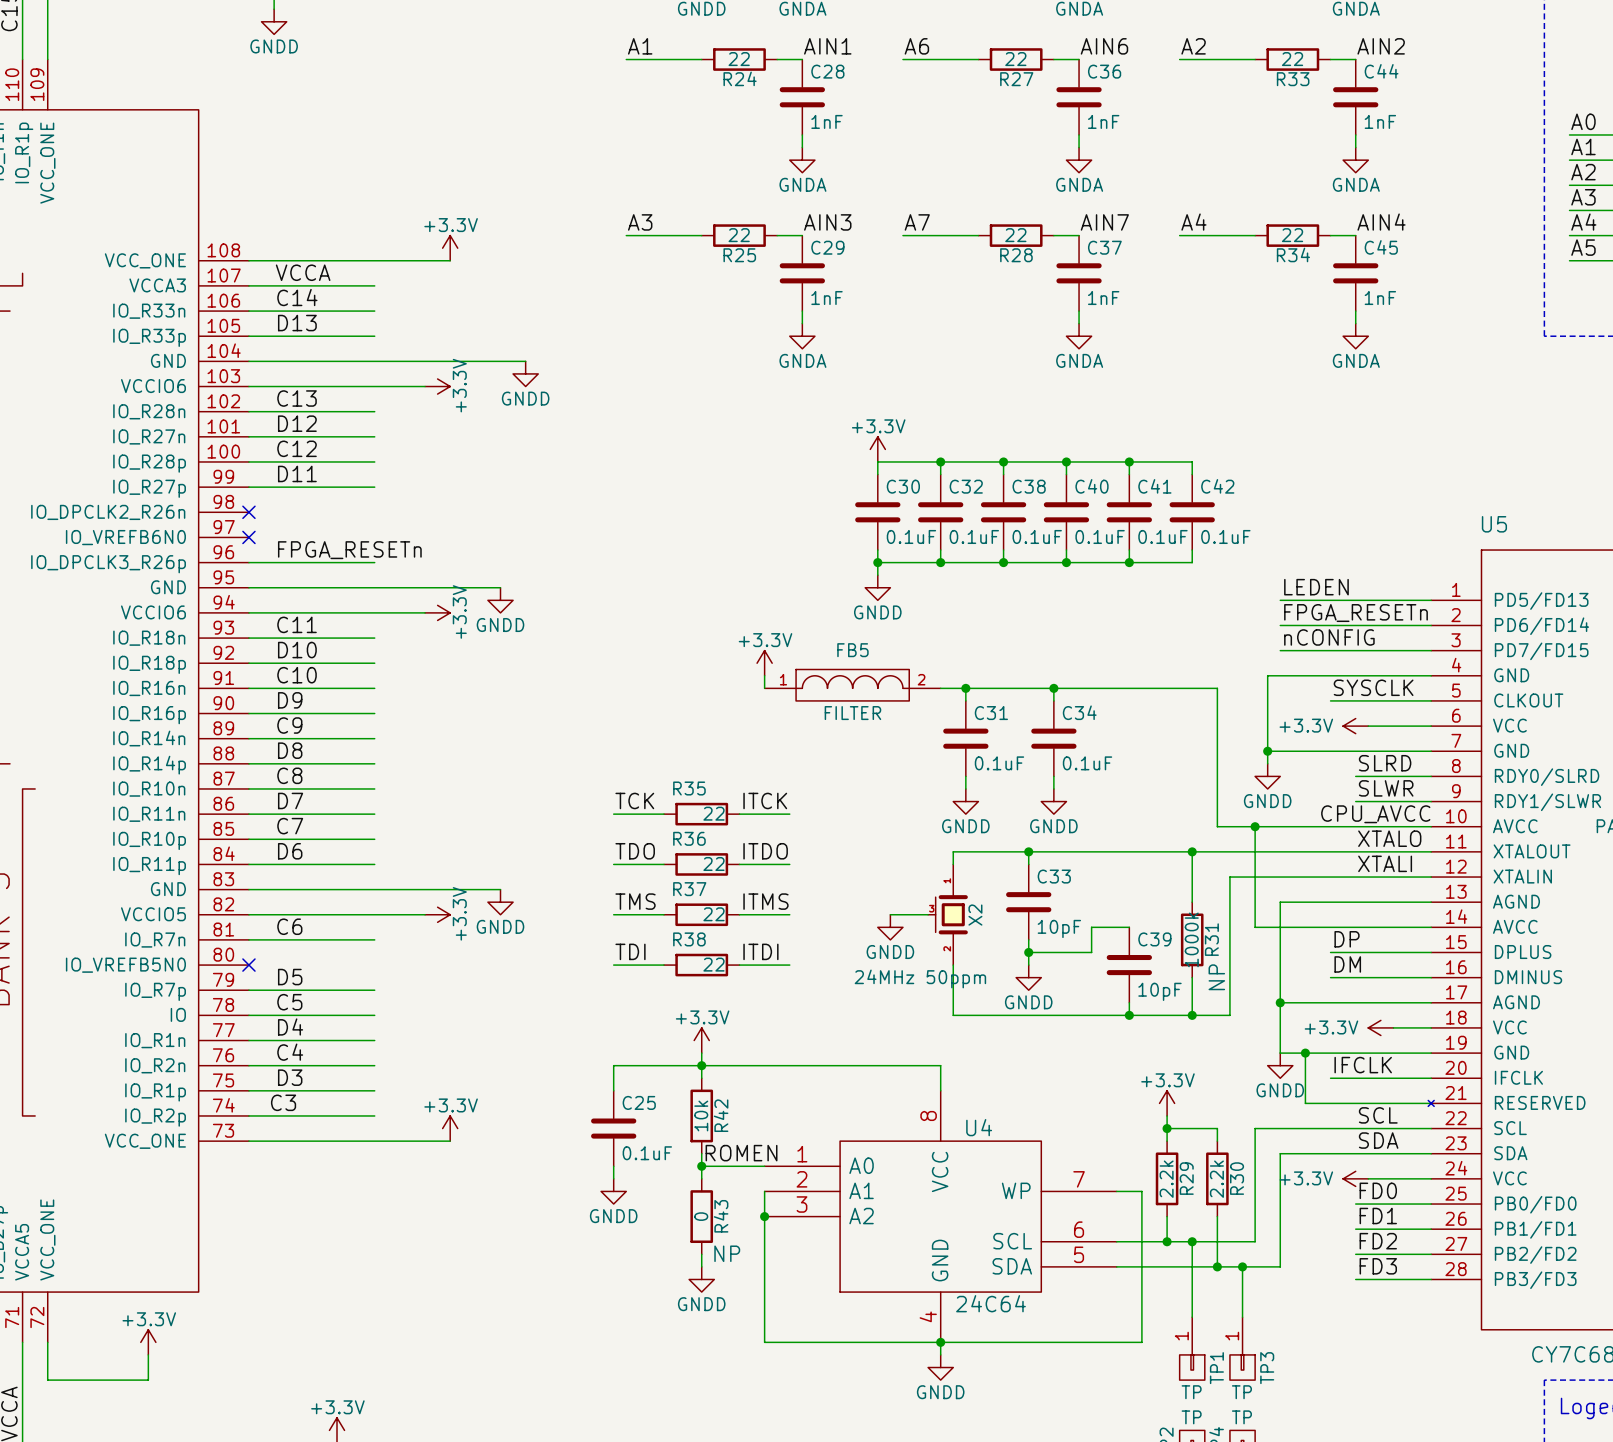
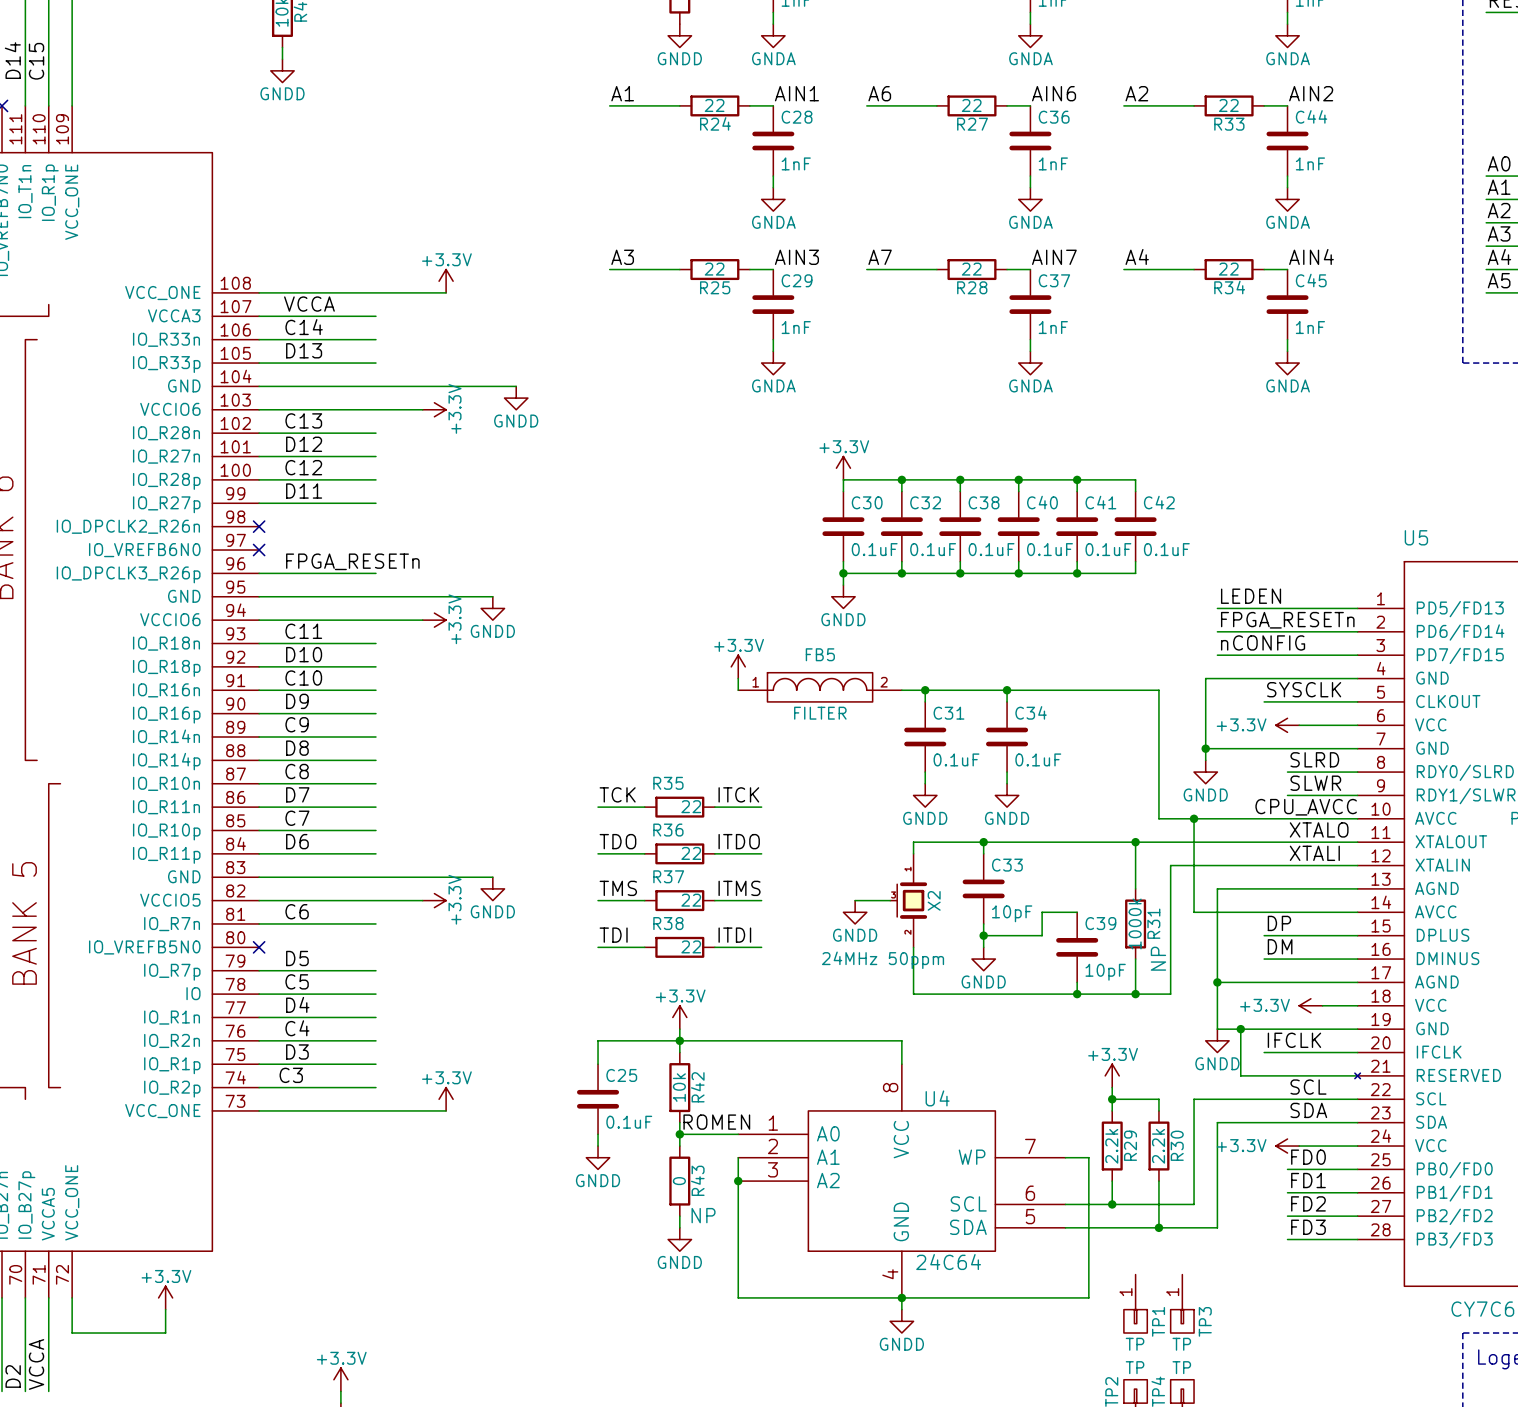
wire: (1192, 1241) (1192, 1317) -> none
junction: (1192, 1241) -> none
wire: (1242, 1266) (1242, 1317) -> none
junction: (1242, 1266) -> none

